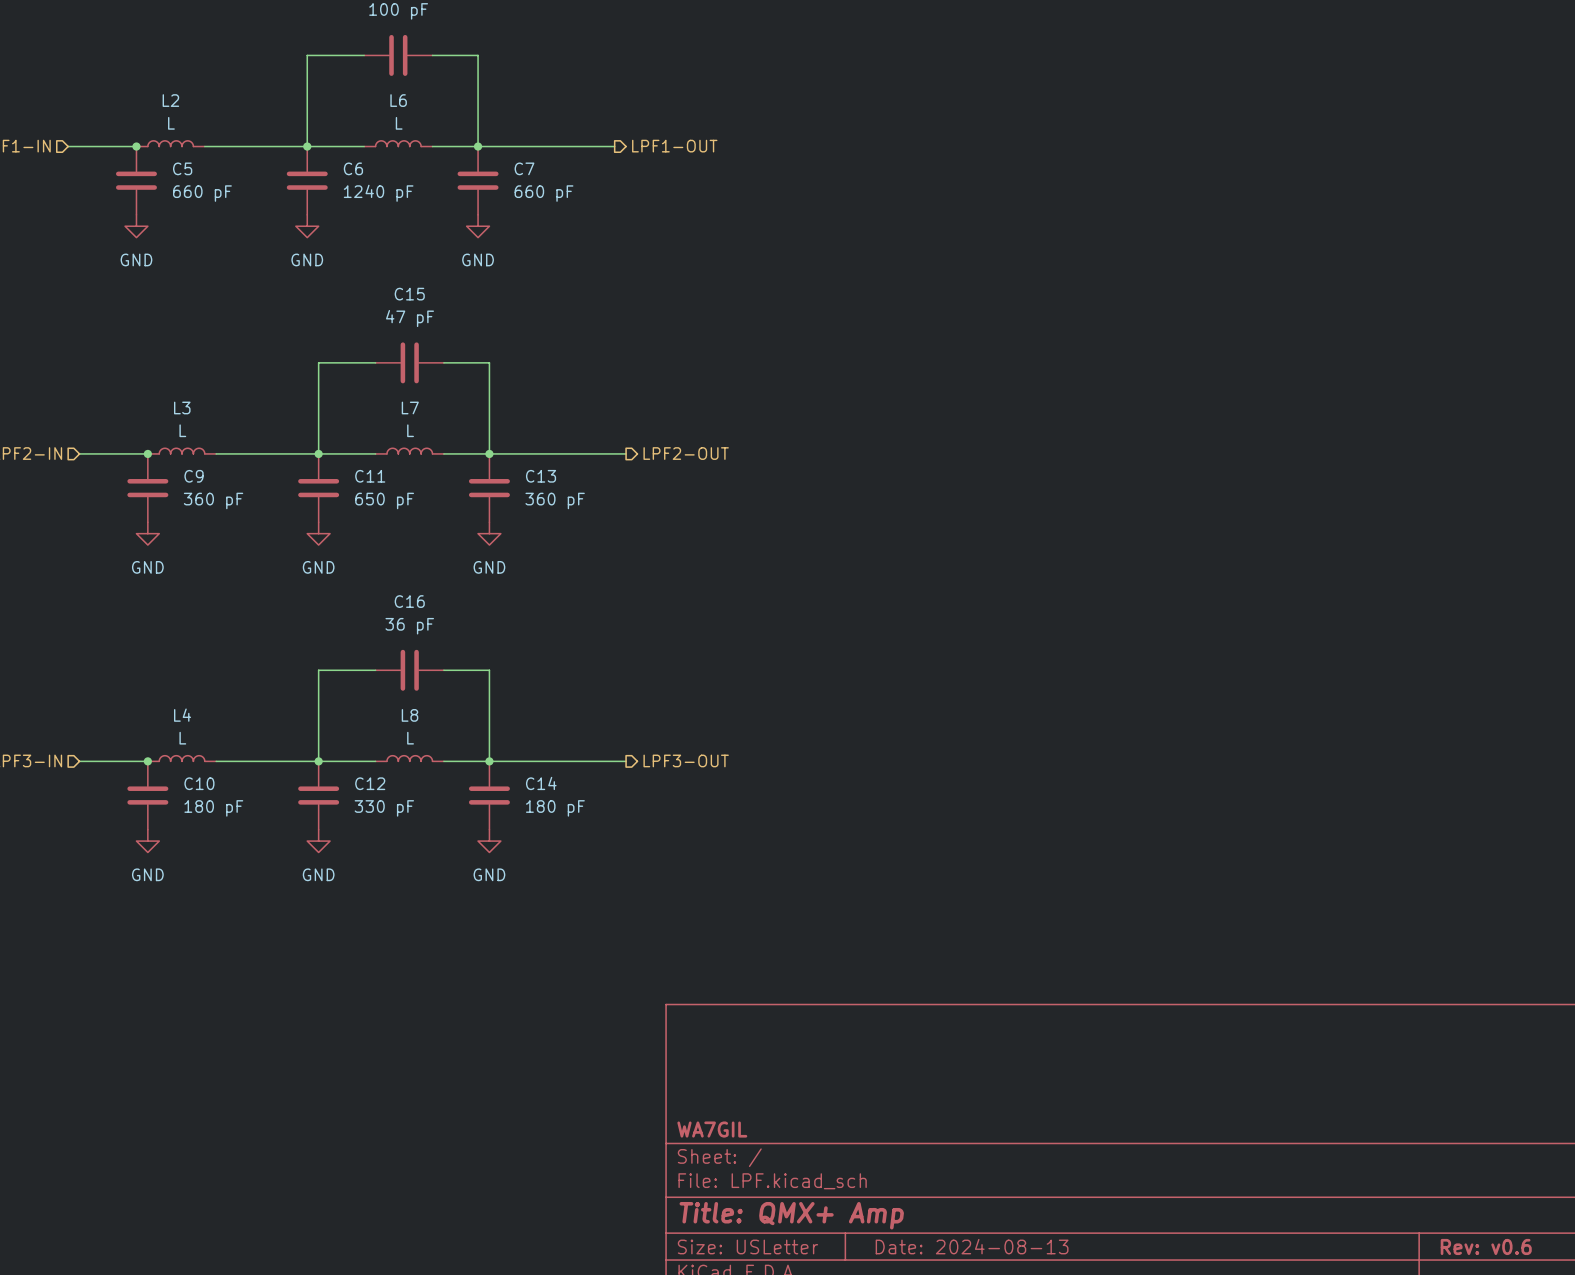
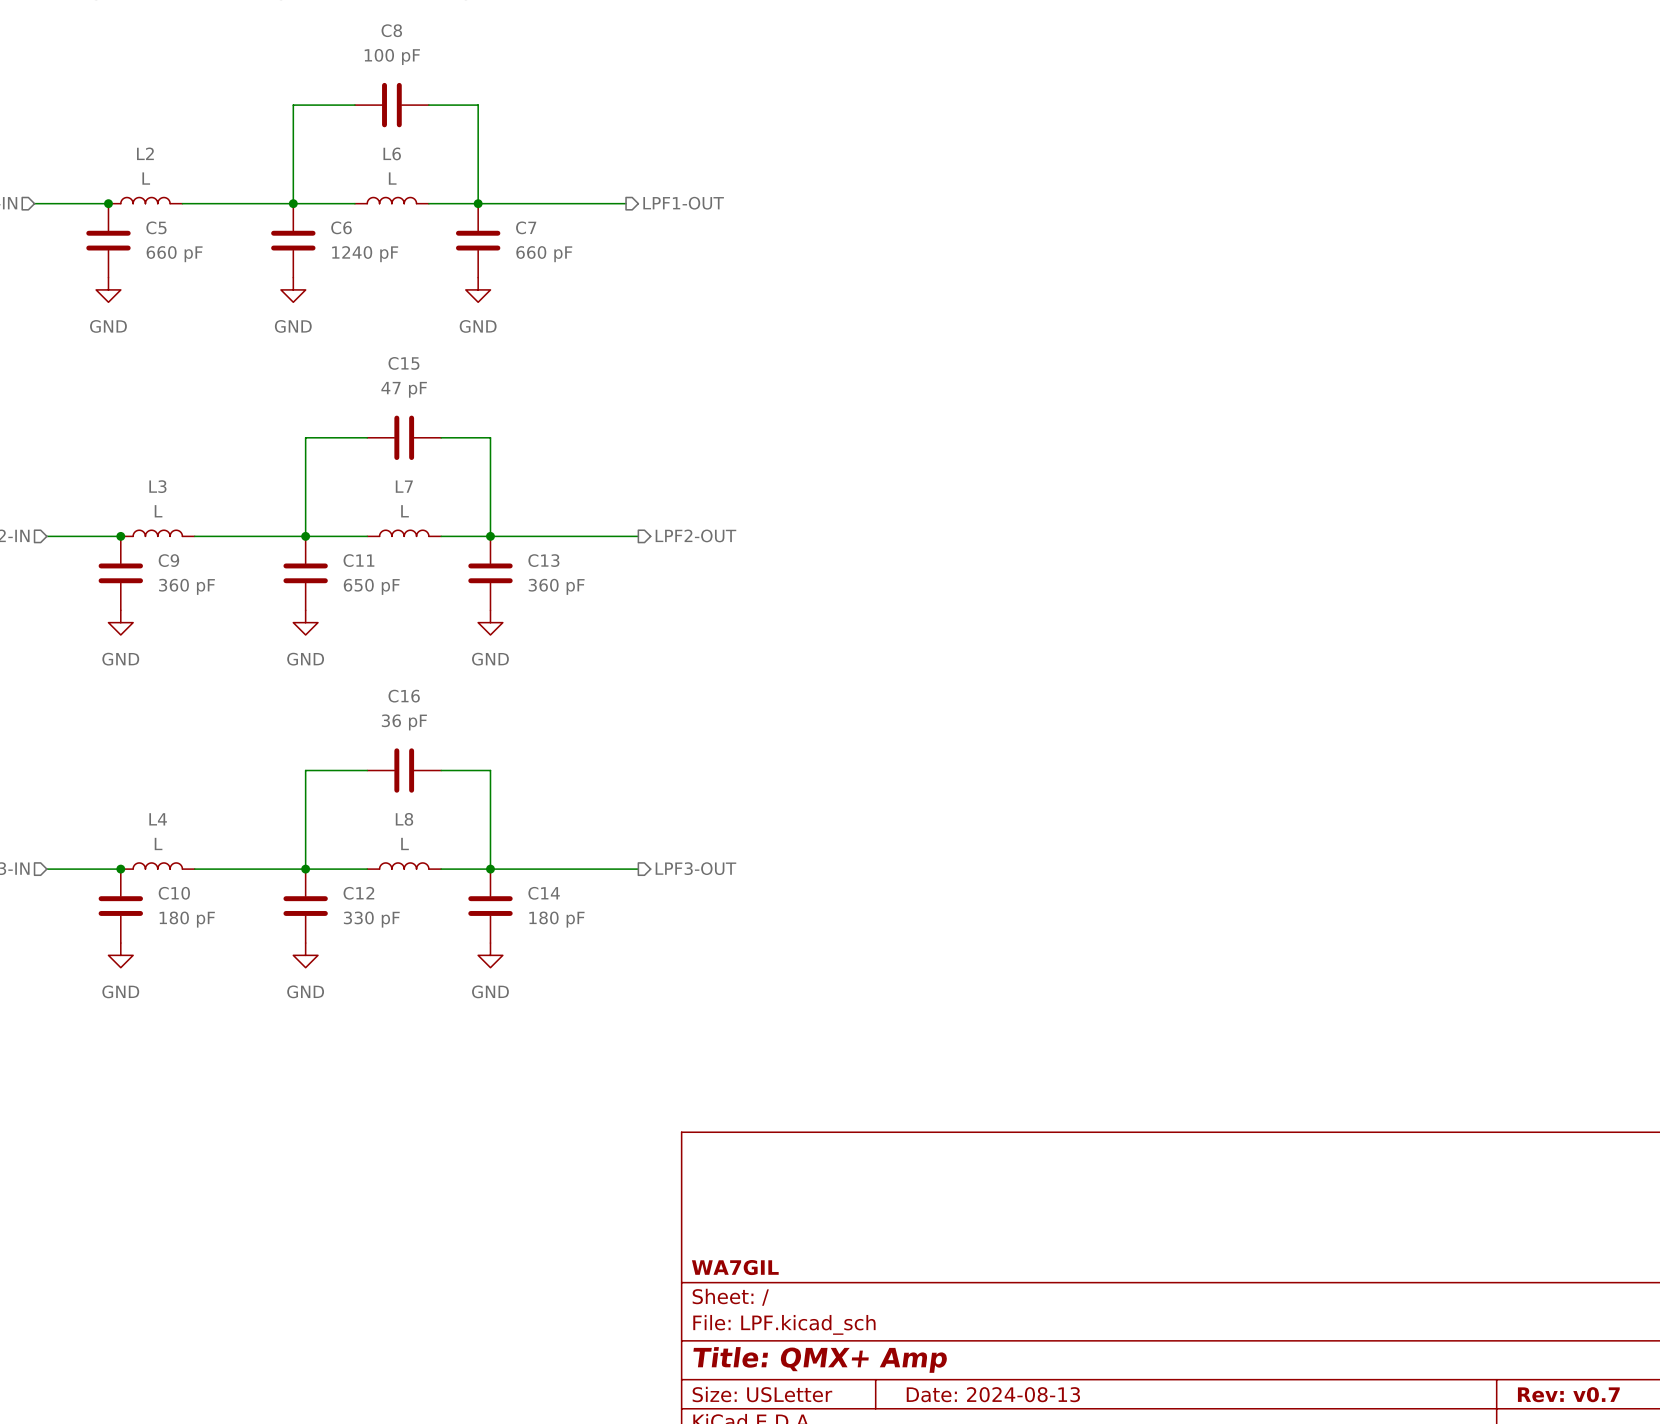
title block: Rev: v0.6 (1486, 1246) -> Rev: v0.7 (1568, 1394)

